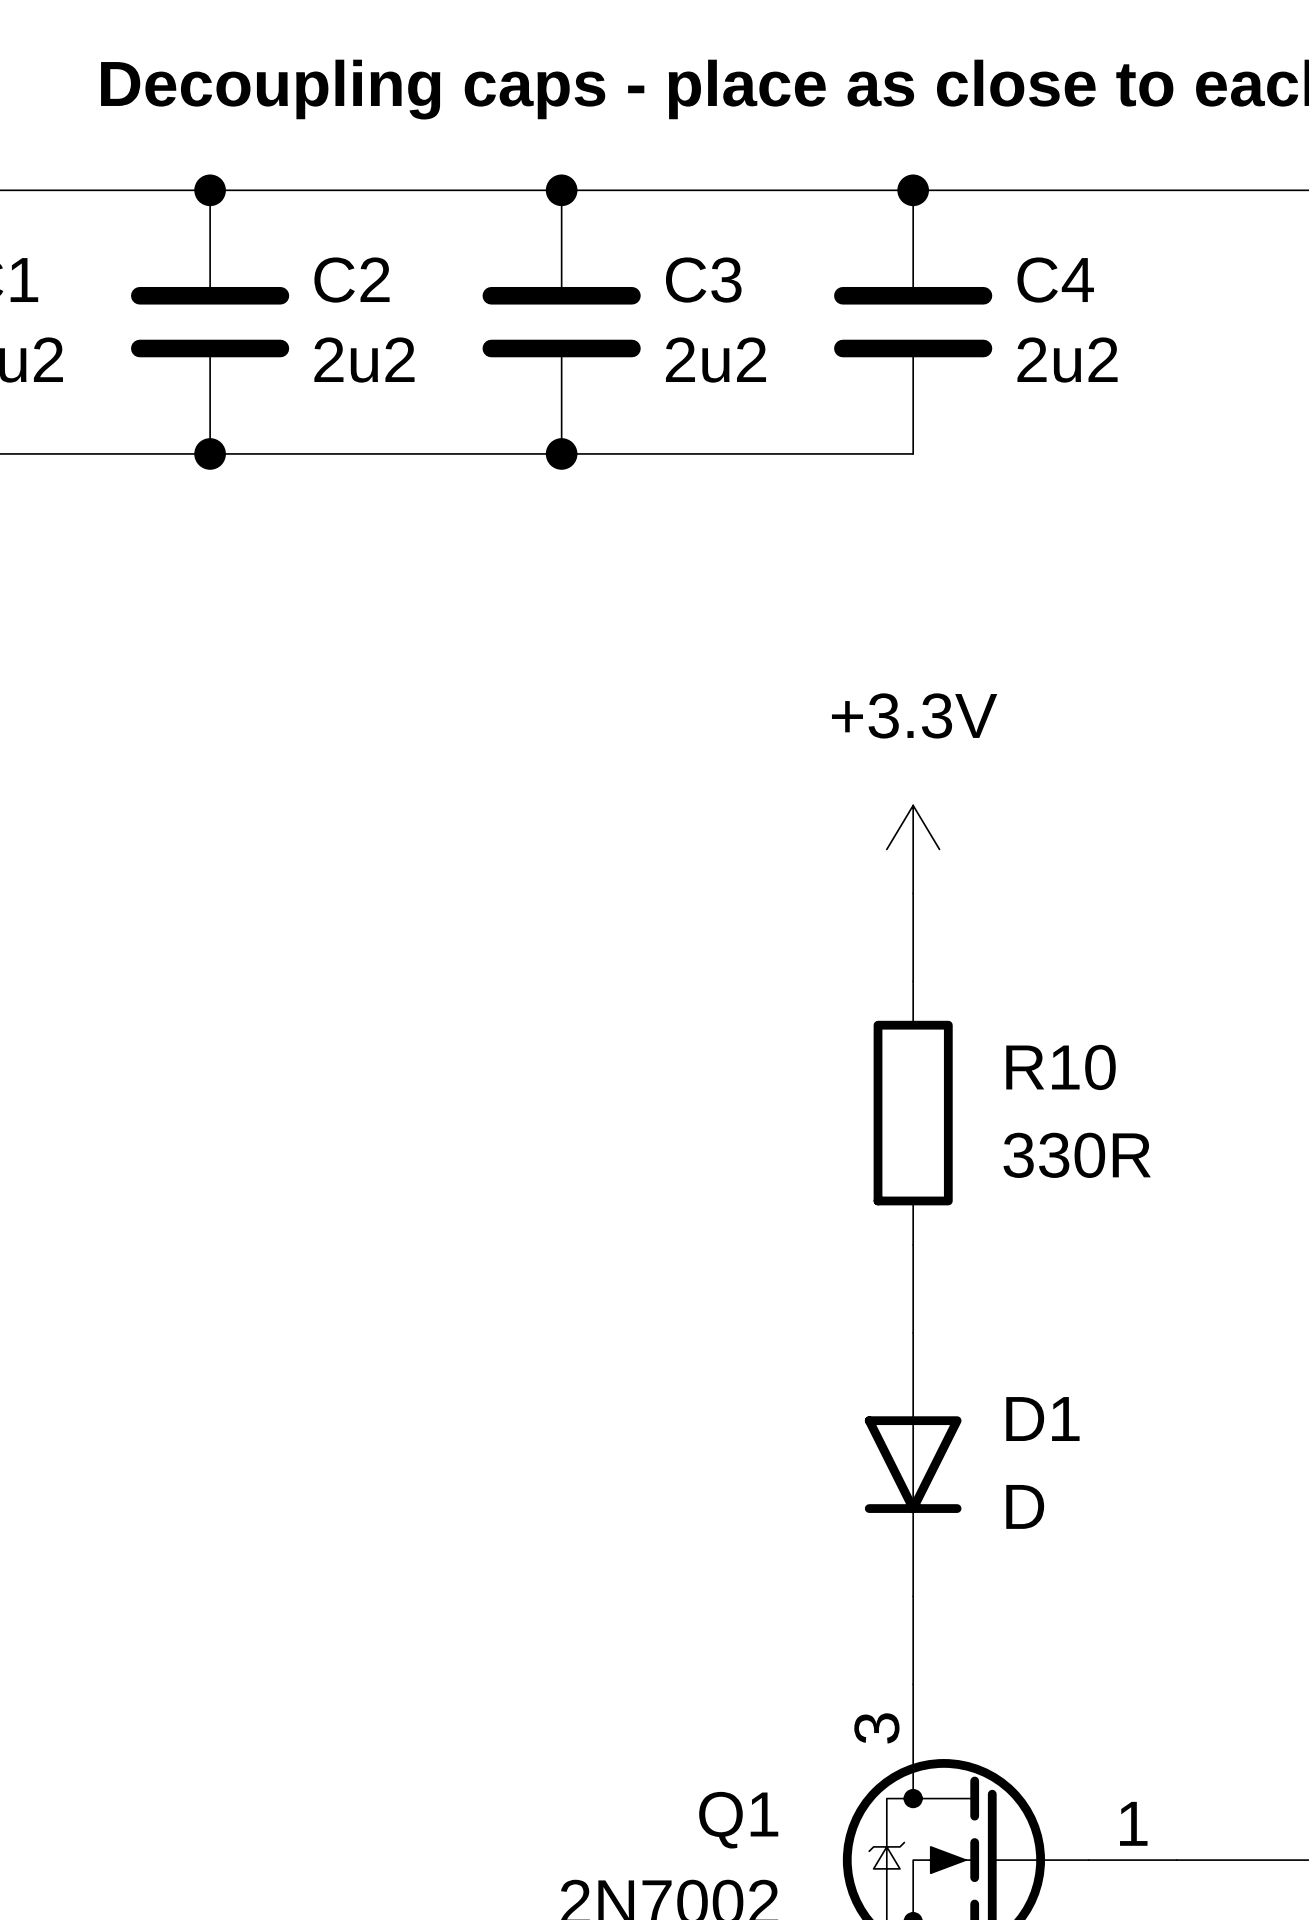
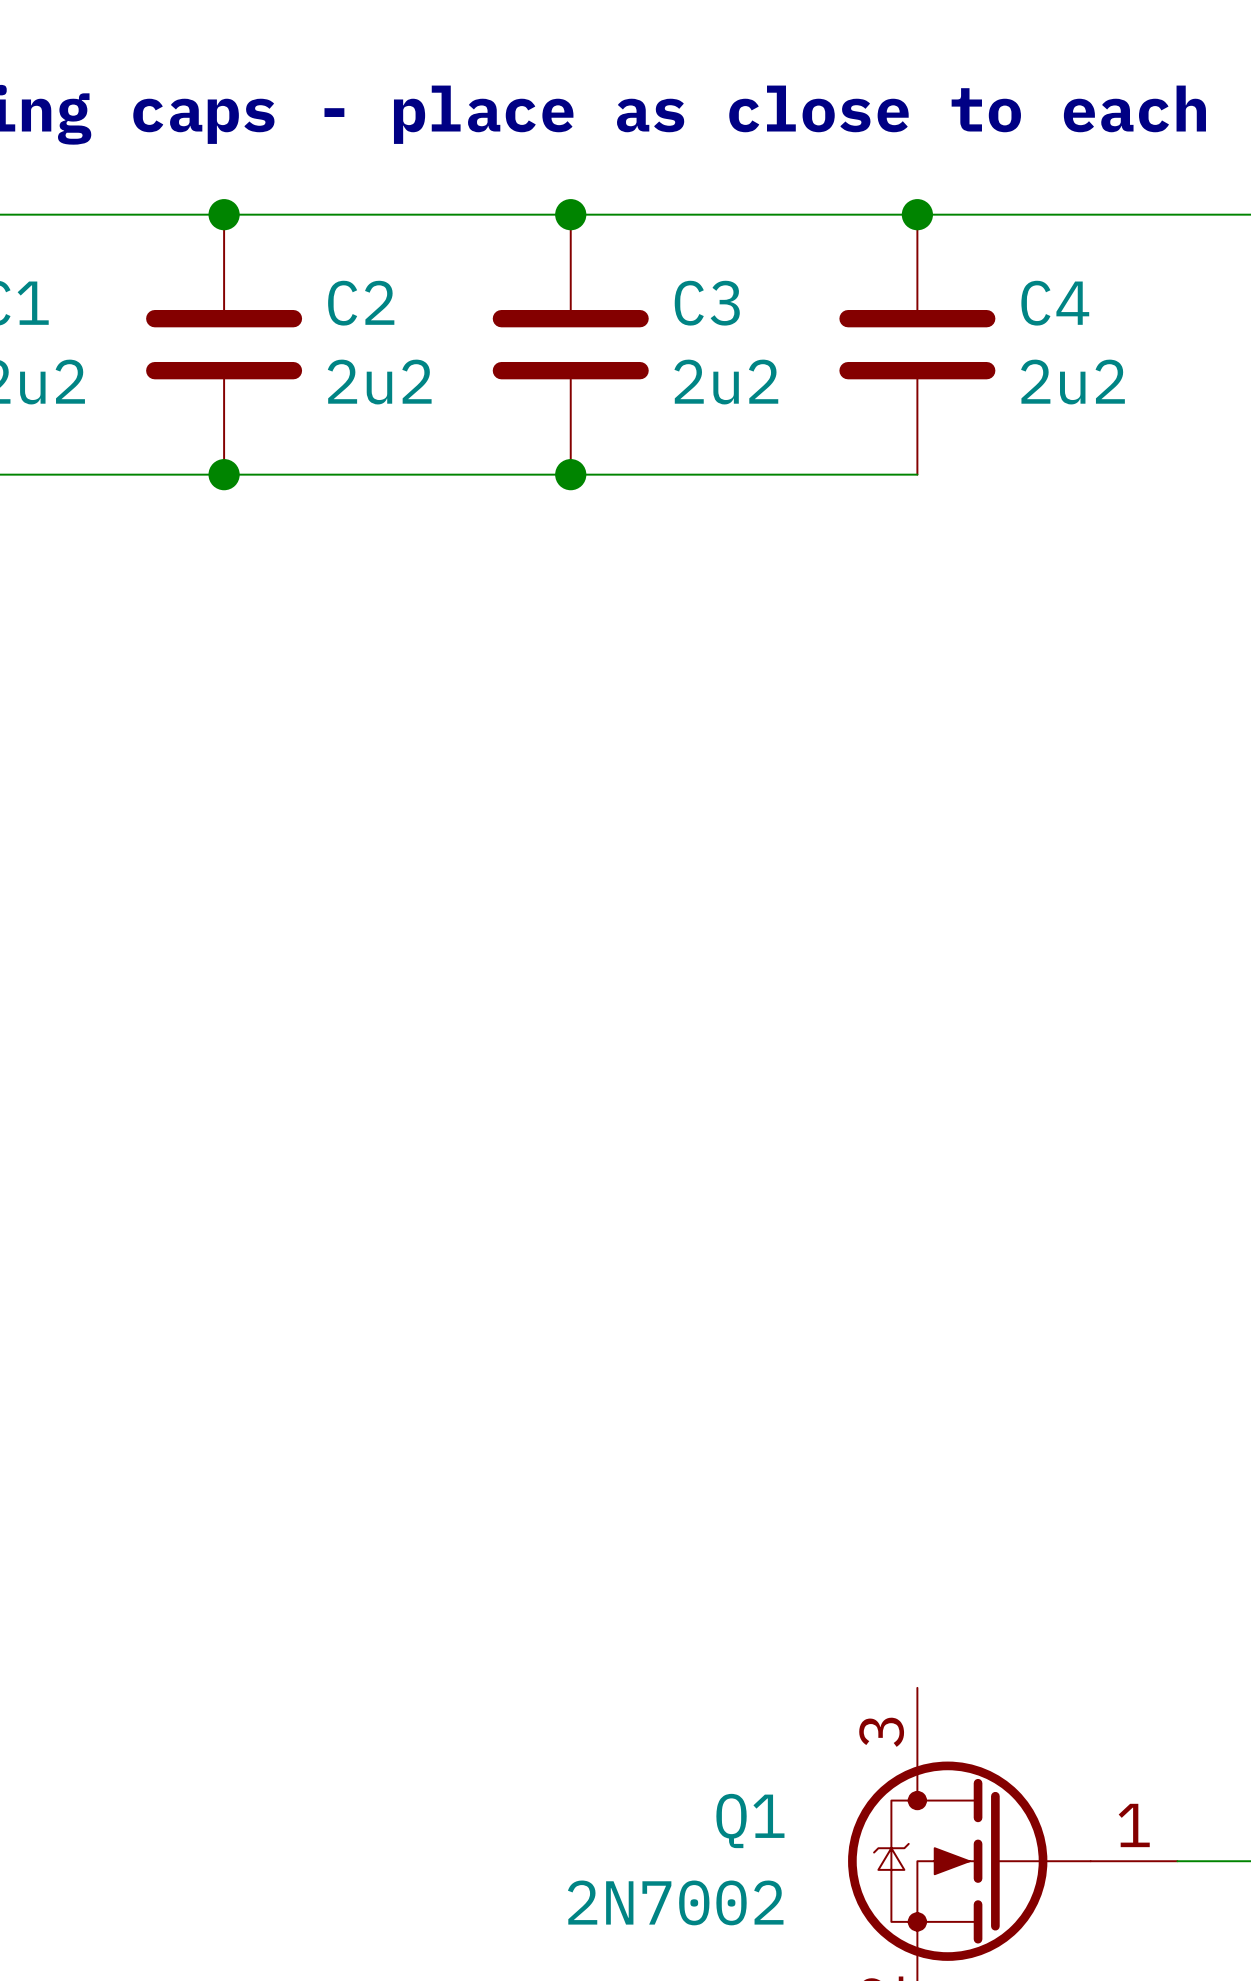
power symbol: +3.3V (913, 849) -> none
wire: (913, 893) (913, 981) -> none
R10: 330R (913, 1113) -> none
wire: (913, 1244) (913, 1332) -> none
D1: D (913, 1464) -> none
wire: (913, 1596) (913, 1684) -> none

